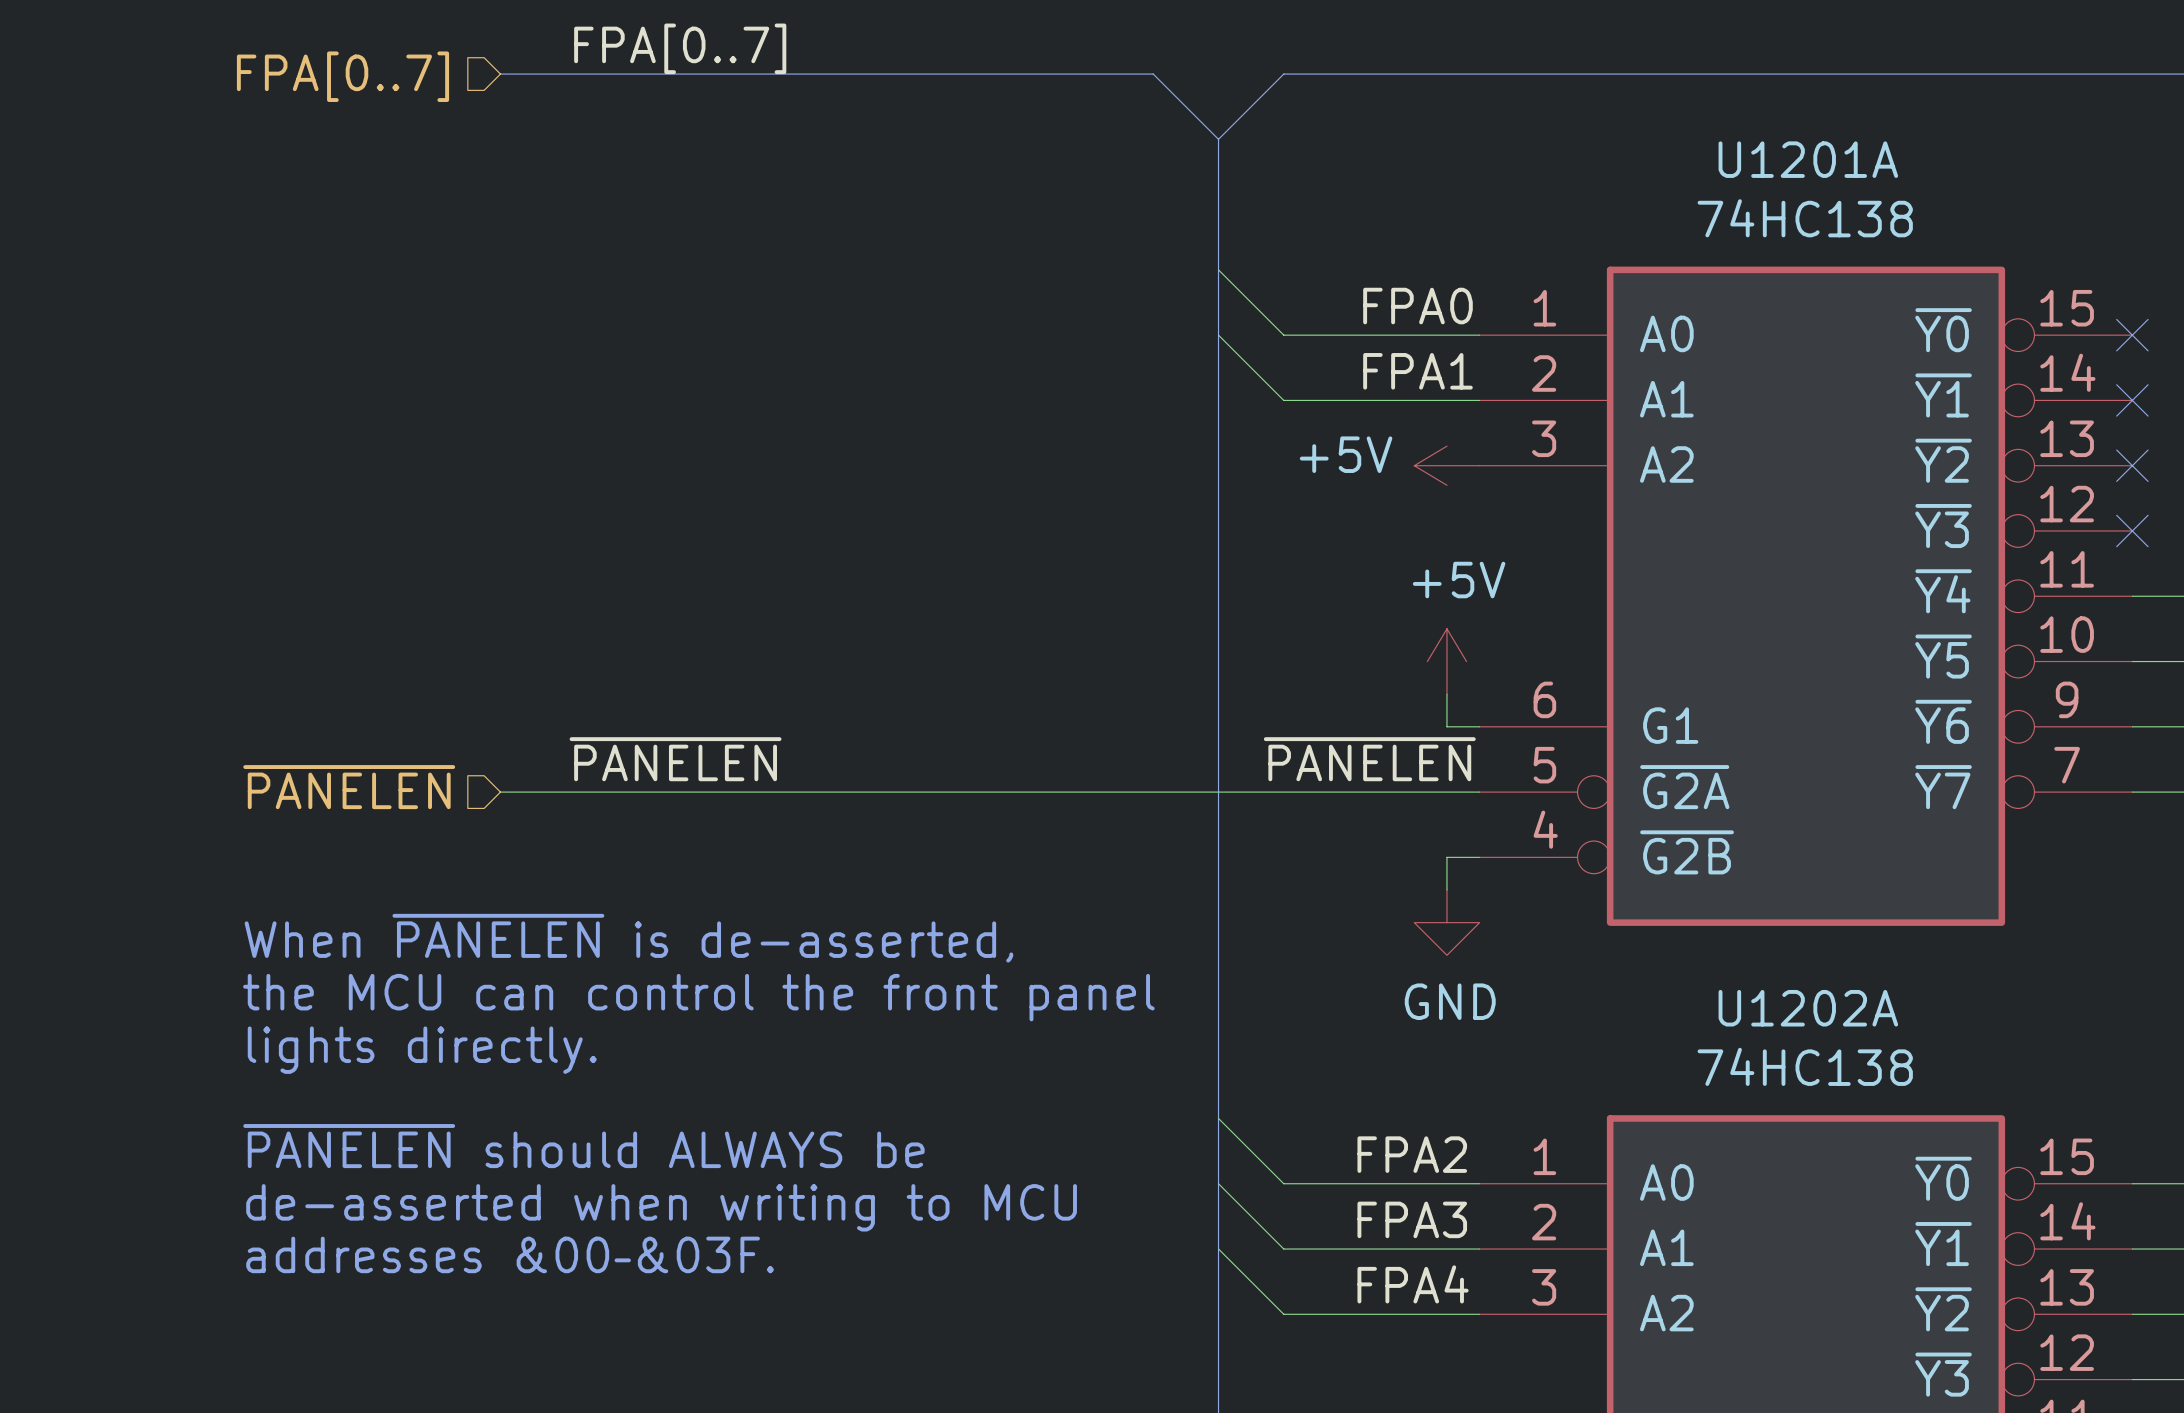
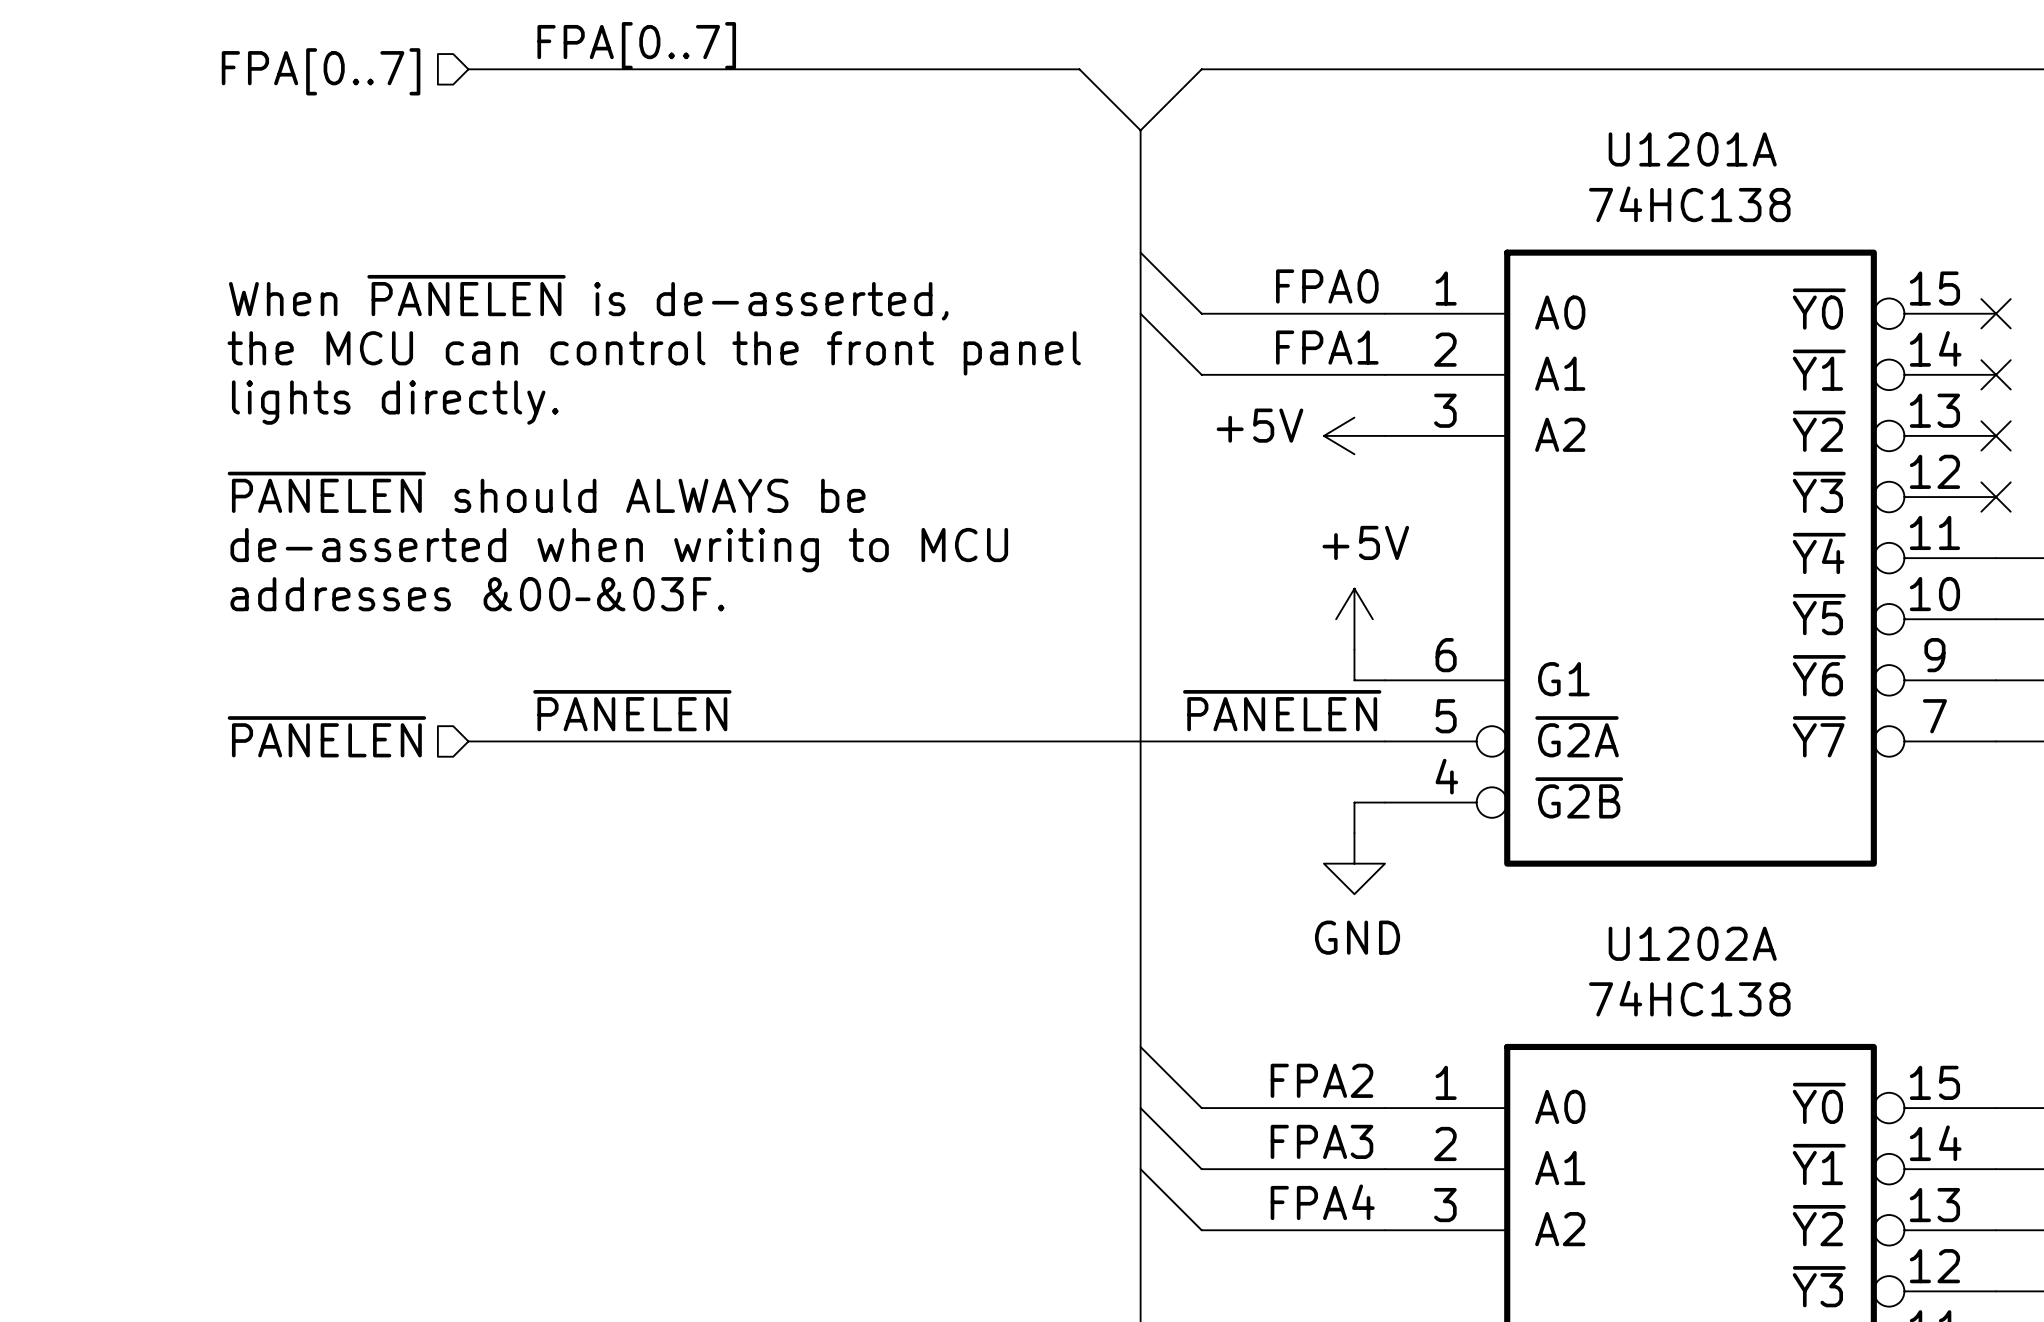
text position: When ~{PANELEN} is de-asserted, (628, 938) -> When ~{PANELEN} is de-asserted, (588, 297)
text position: the MCU can control the front panel (698, 997) -> the MCU can control the front panel (654, 353)
text position: lights directly. (422, 1050) -> lights directly. (395, 402)
text position: ~{PANELEN} should ALWAYS be (583, 1146) -> ~{PANELEN} should ALWAYS be (546, 492)
text position: de-asserted when writing to MCU (661, 1207) -> de-asserted when writing to MCU (619, 550)
text position: addresses &00–&03F. (510, 1254) -> addresses &00–&03F. (477, 594)

